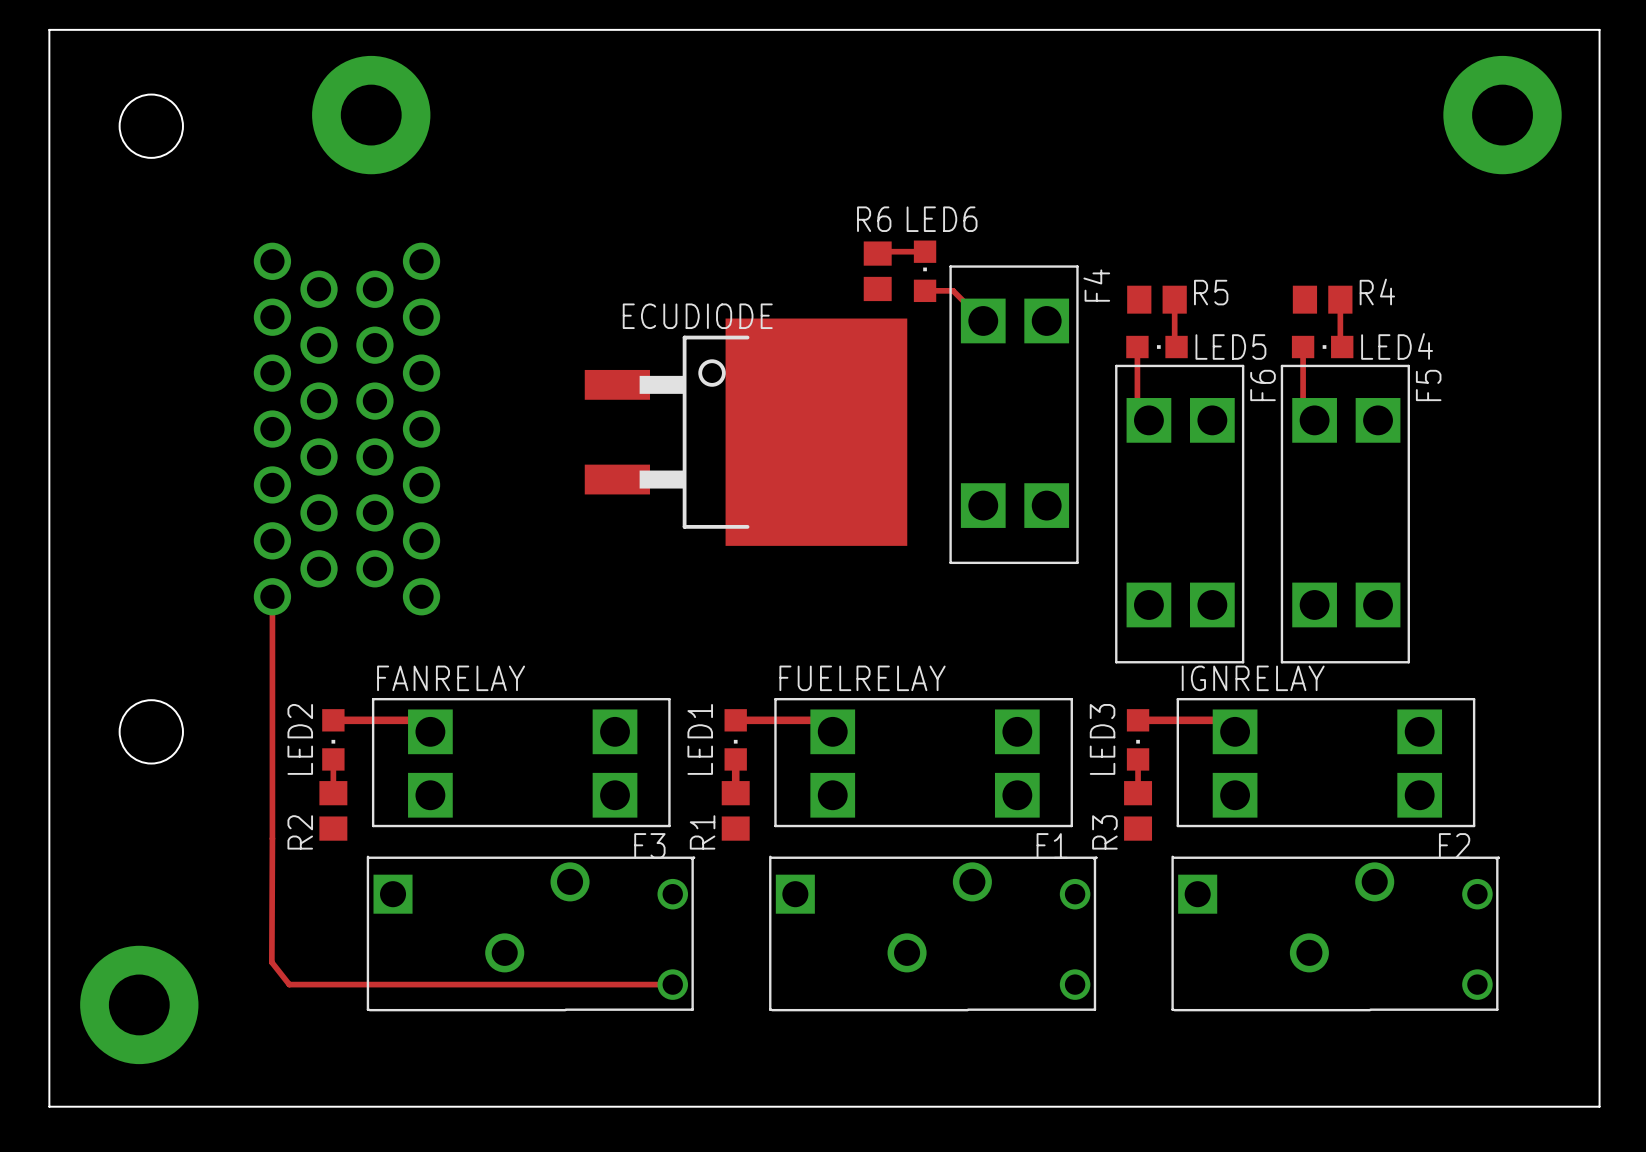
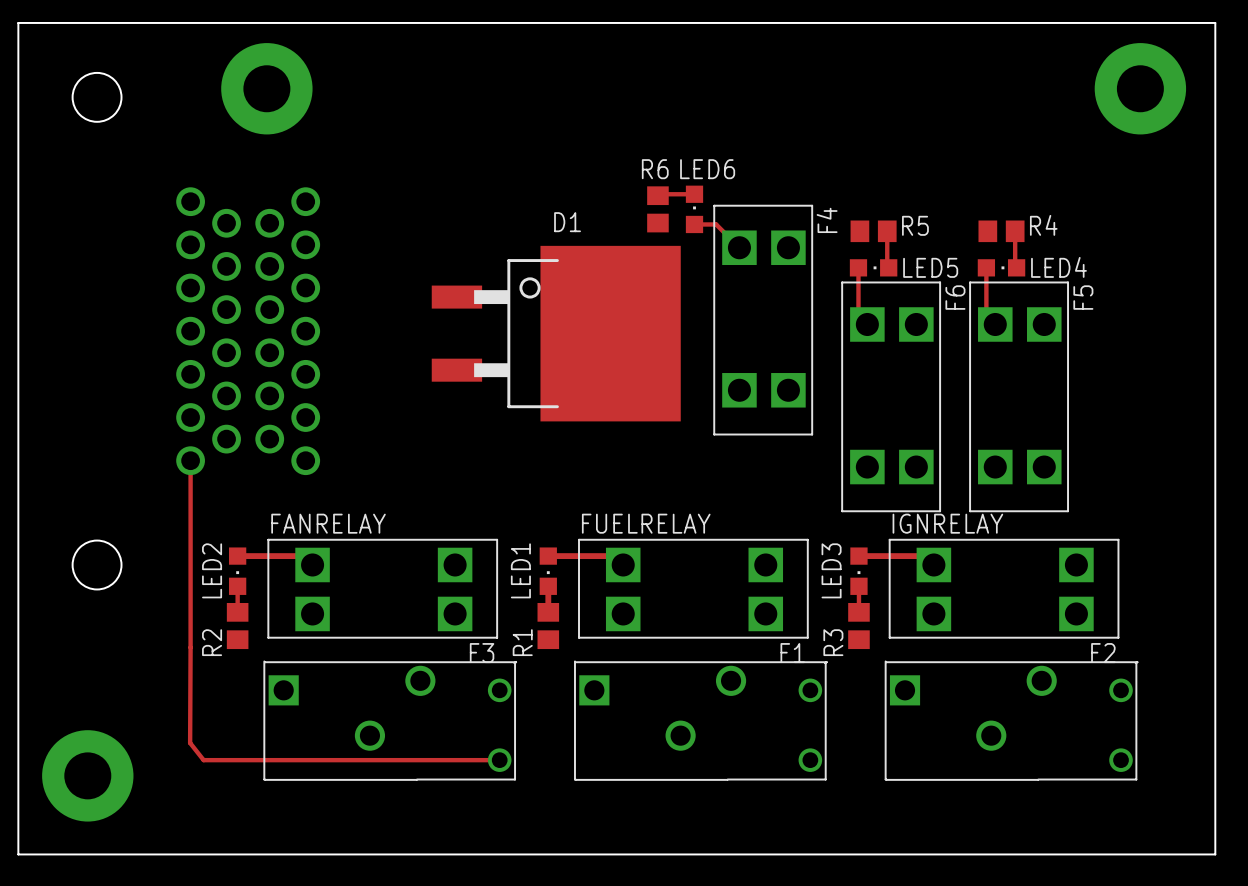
ECUDIODE name: ECUDIODE (697, 316) -> D1 (567, 222)

